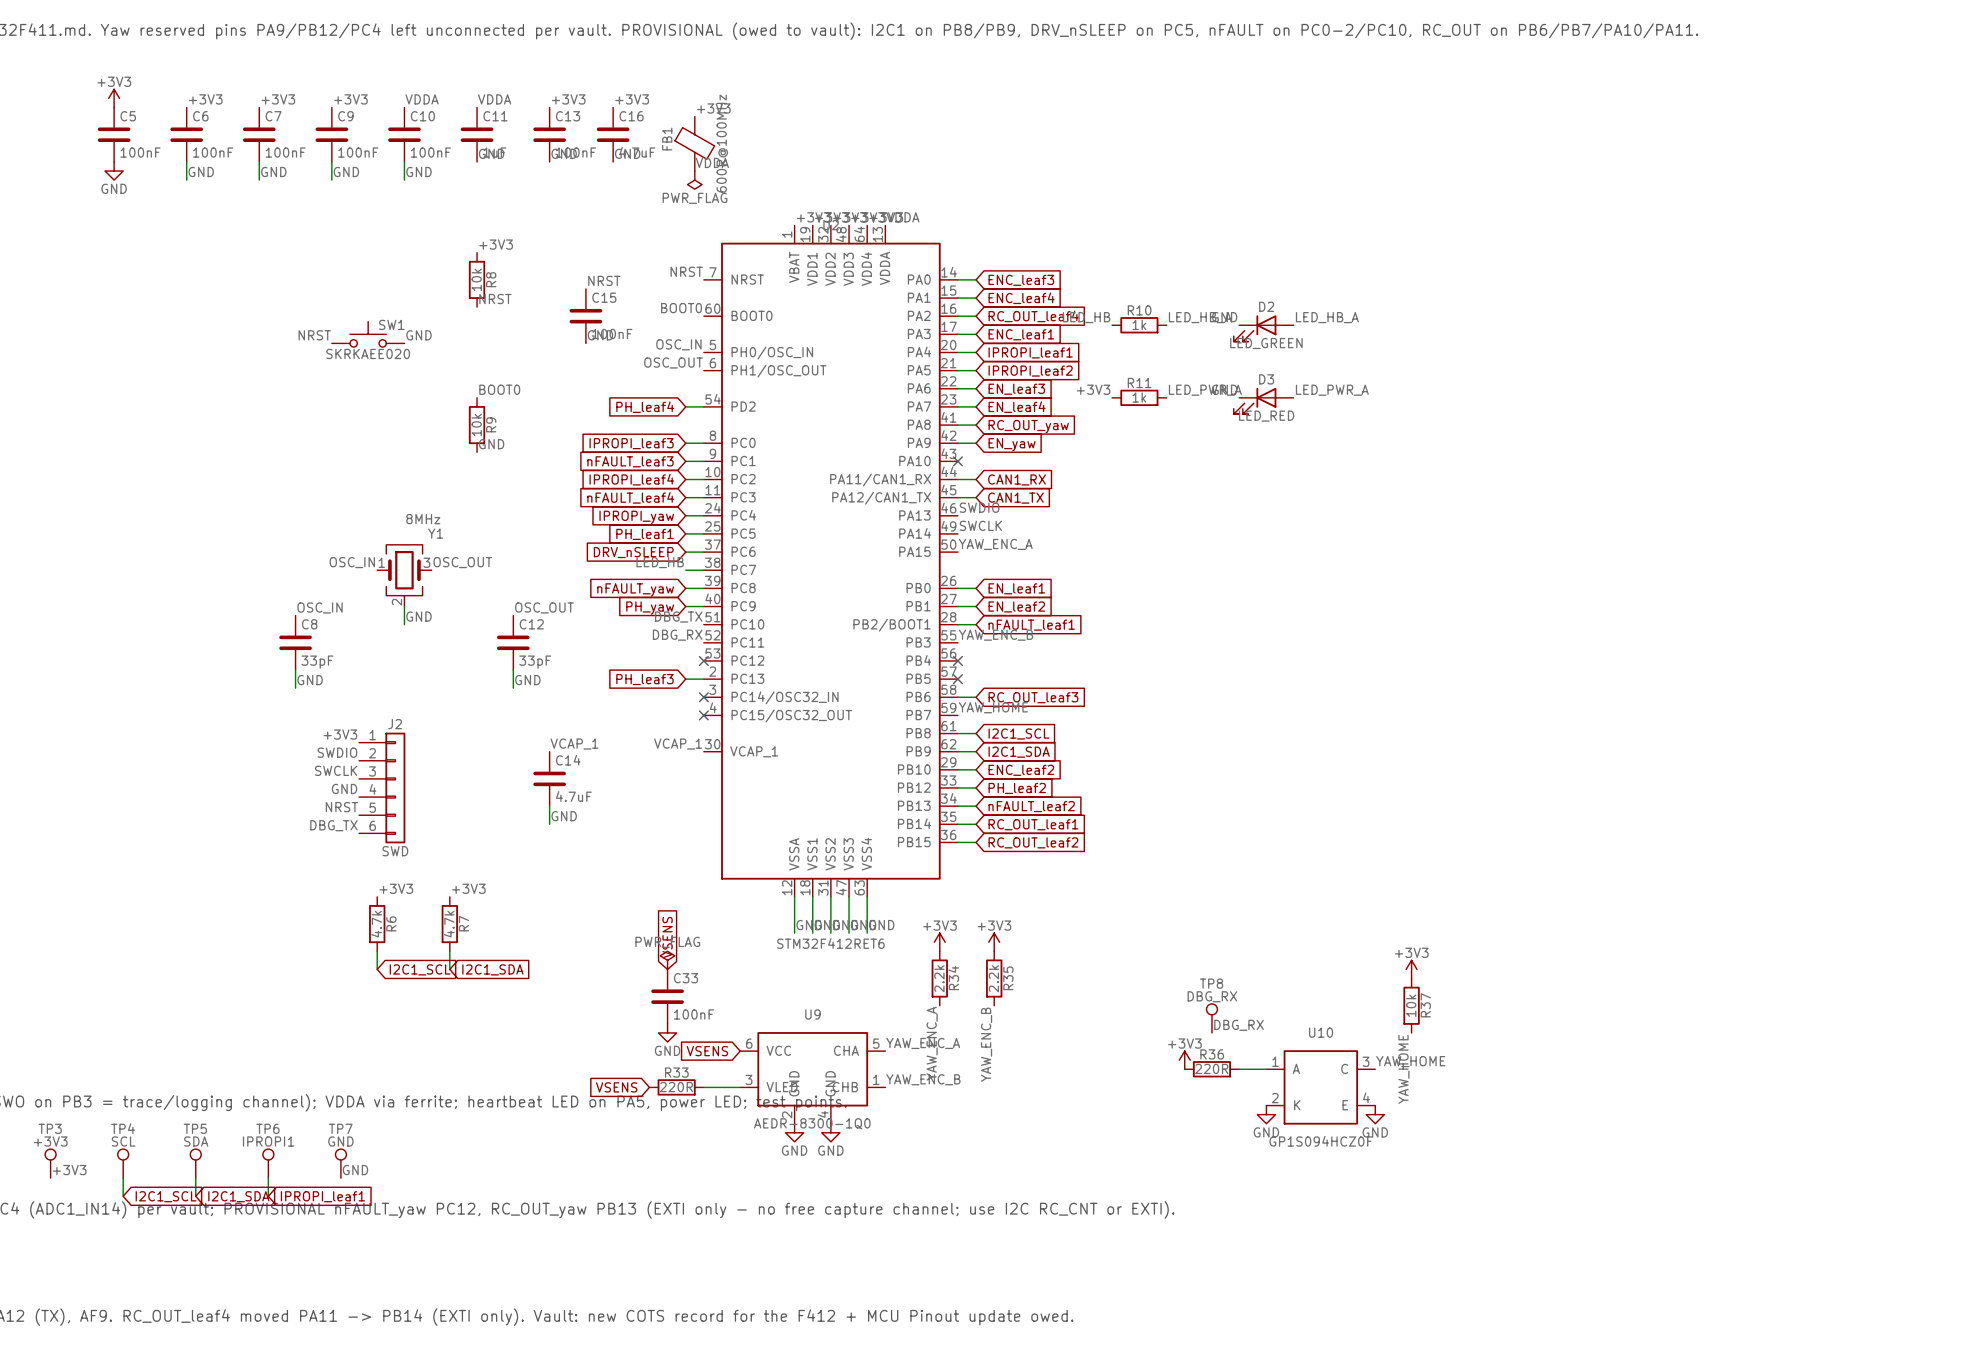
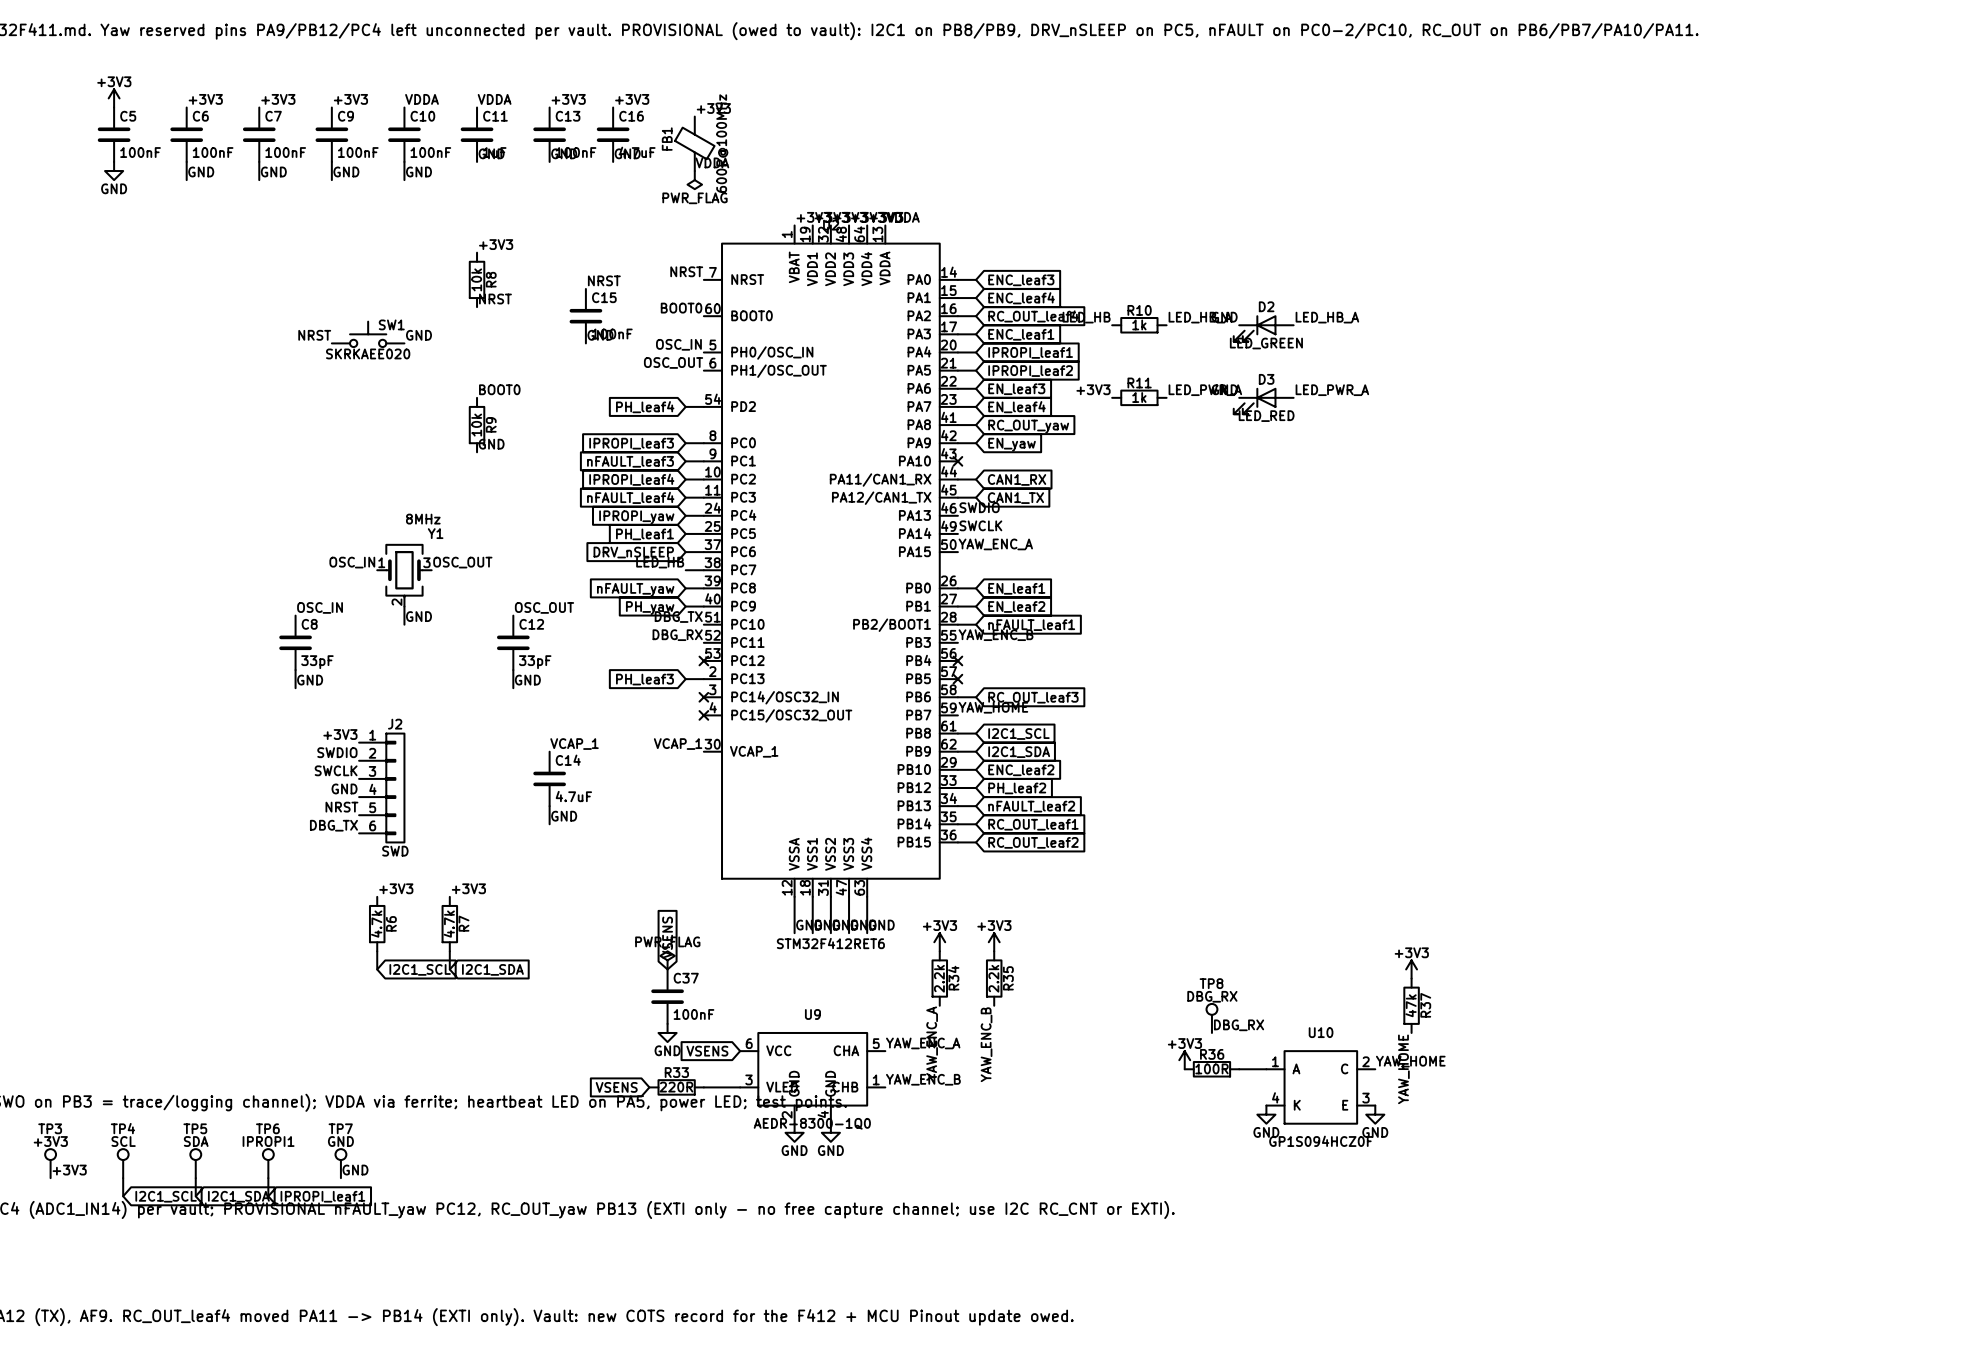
C33 name: C33 (686, 978) -> C37 (686, 978)
R37 value: 10k (1411, 1005) -> 47k (1411, 1005)
U10 pin number: 3 (1365, 1061) -> 2 (1365, 1061)
R36 value: 220R (1211, 1068) -> 100R (1211, 1068)
U10 pin number: 4 (1366, 1097) -> 3 (1365, 1098)
U10 pin number: 2 (1275, 1098) -> 4 (1275, 1097)

